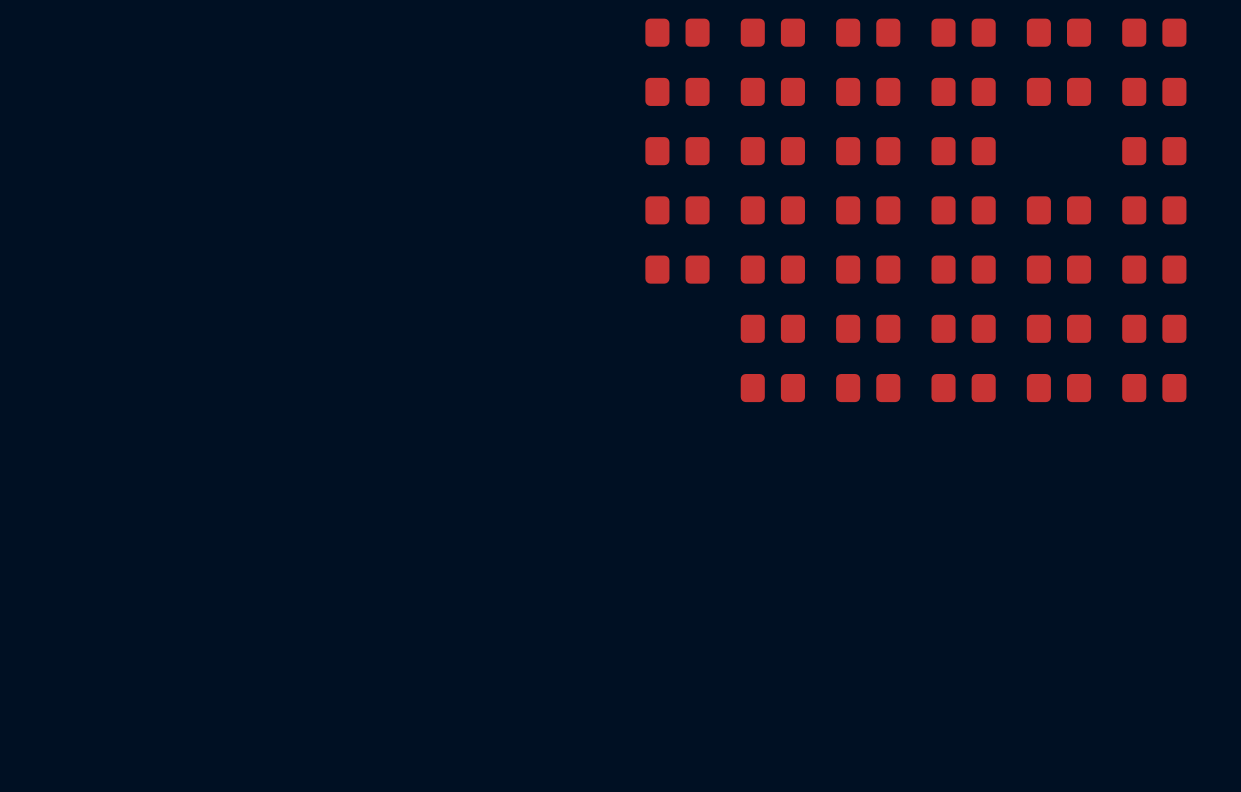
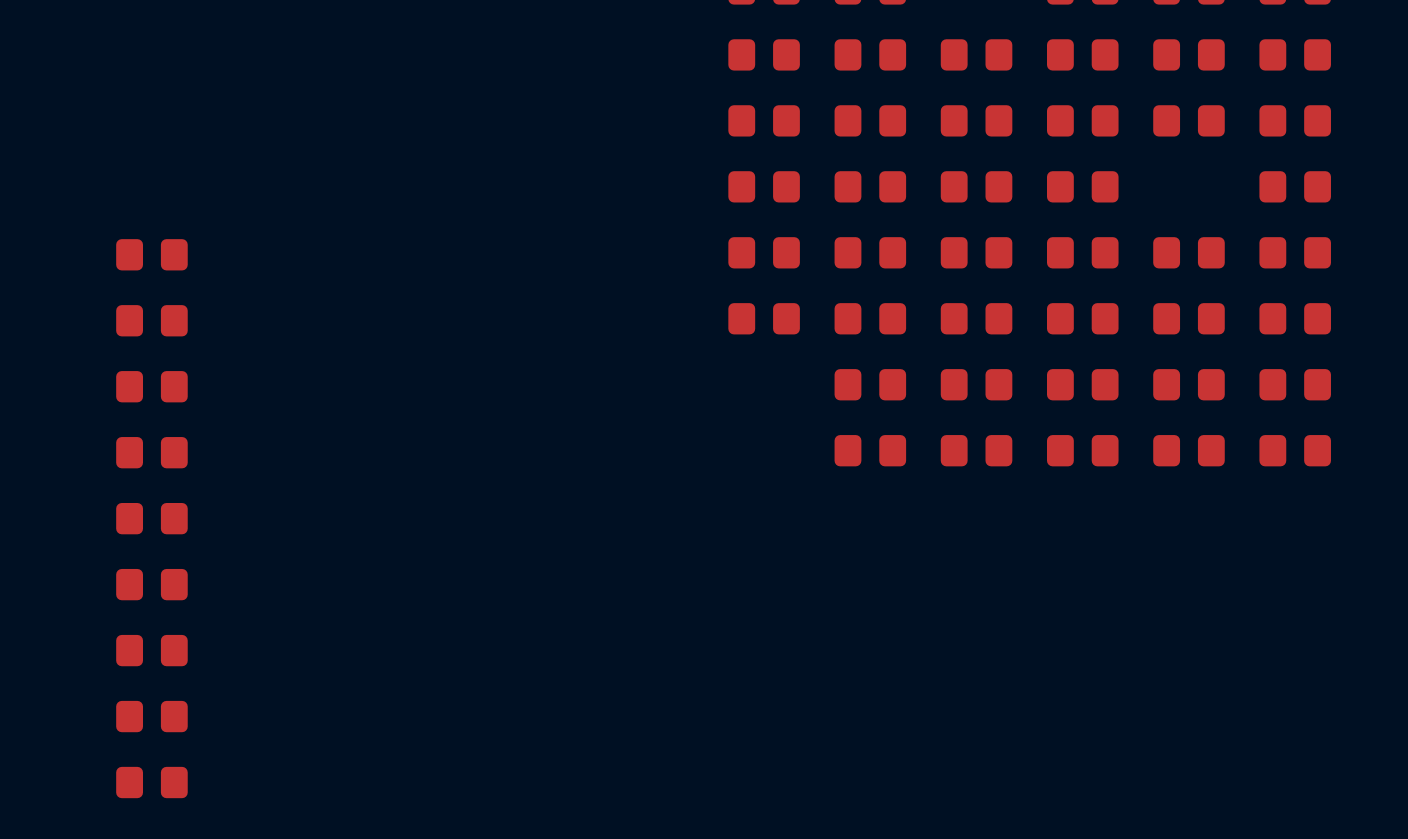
part: none -> (151, 254)
part: none -> (151, 320)
part: none -> (151, 386)
part: none -> (151, 452)
part: none -> (151, 518)
part: none -> (151, 584)
part: none -> (151, 650)
part: none -> (151, 716)
part: none -> (151, 782)

